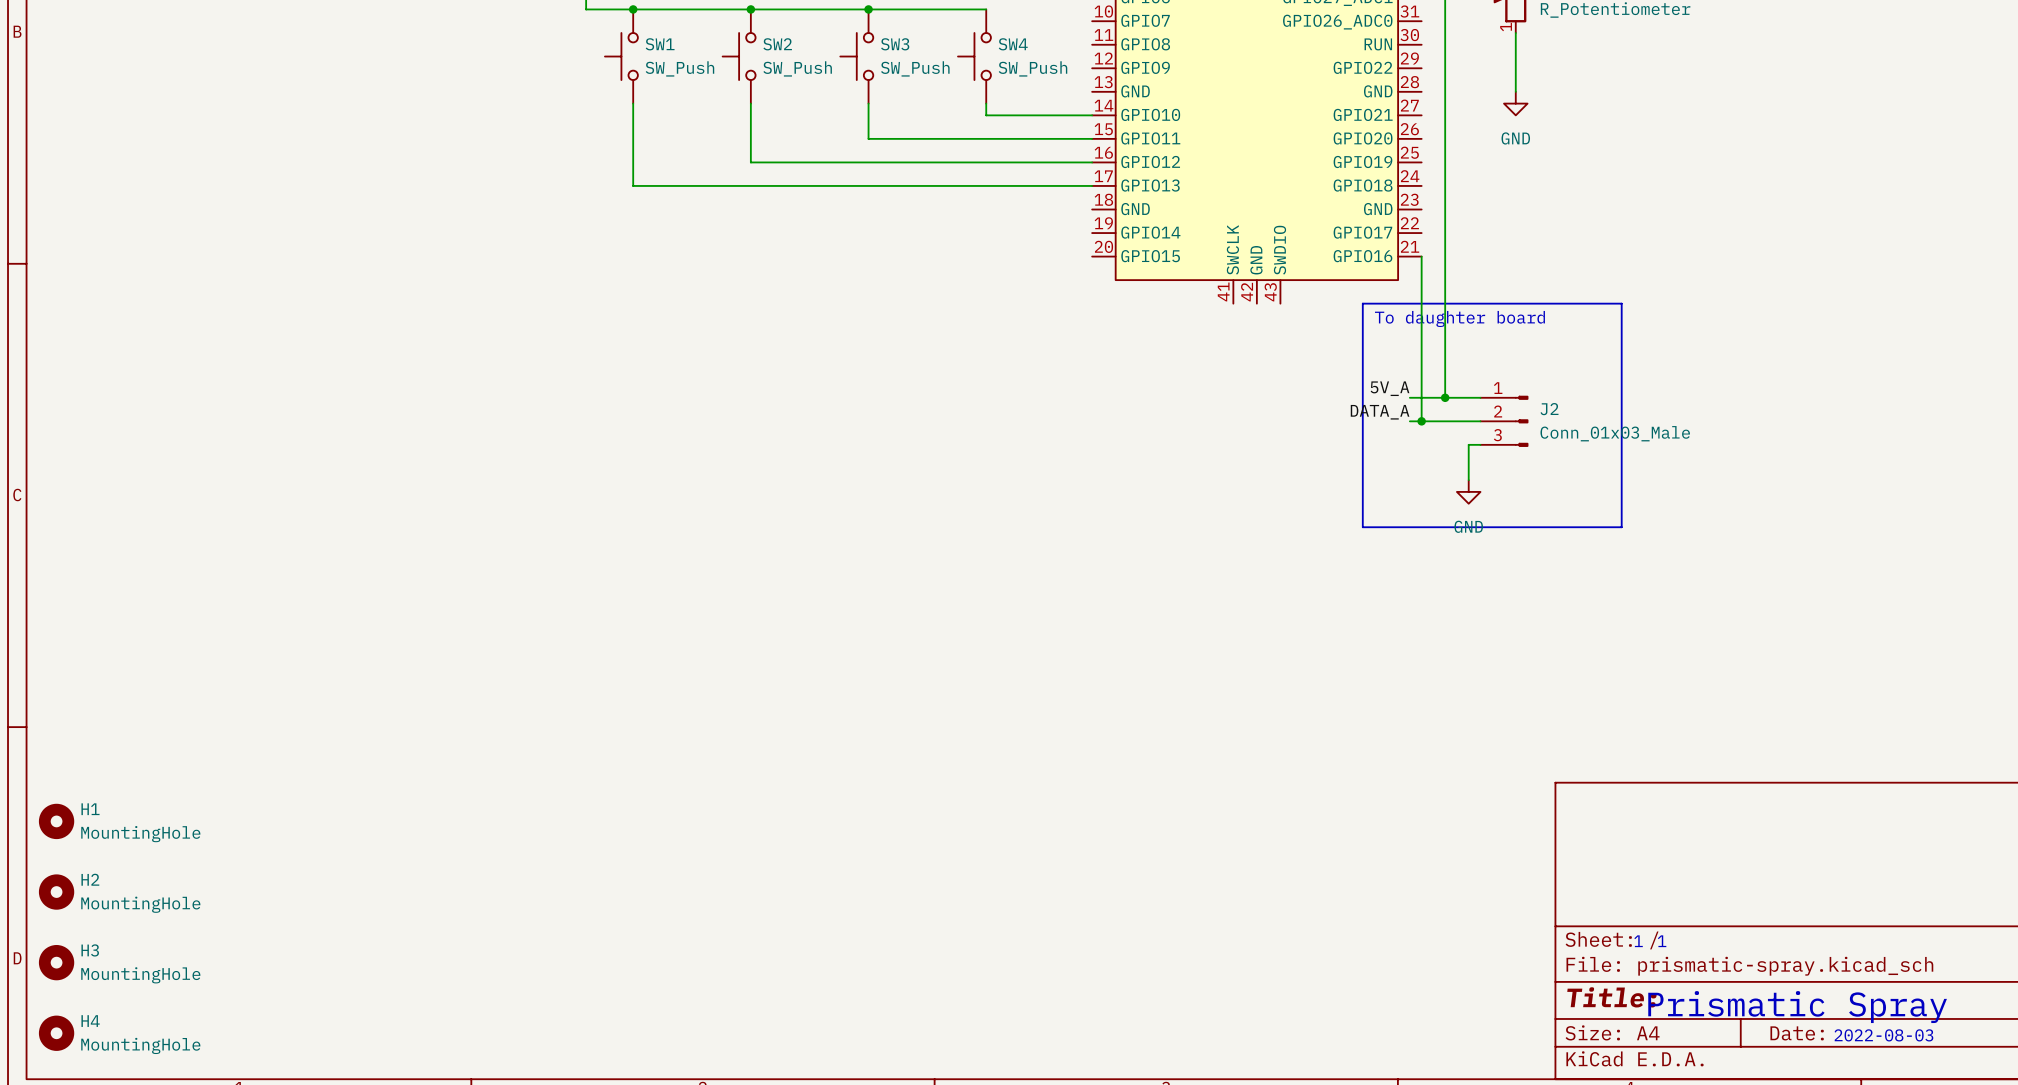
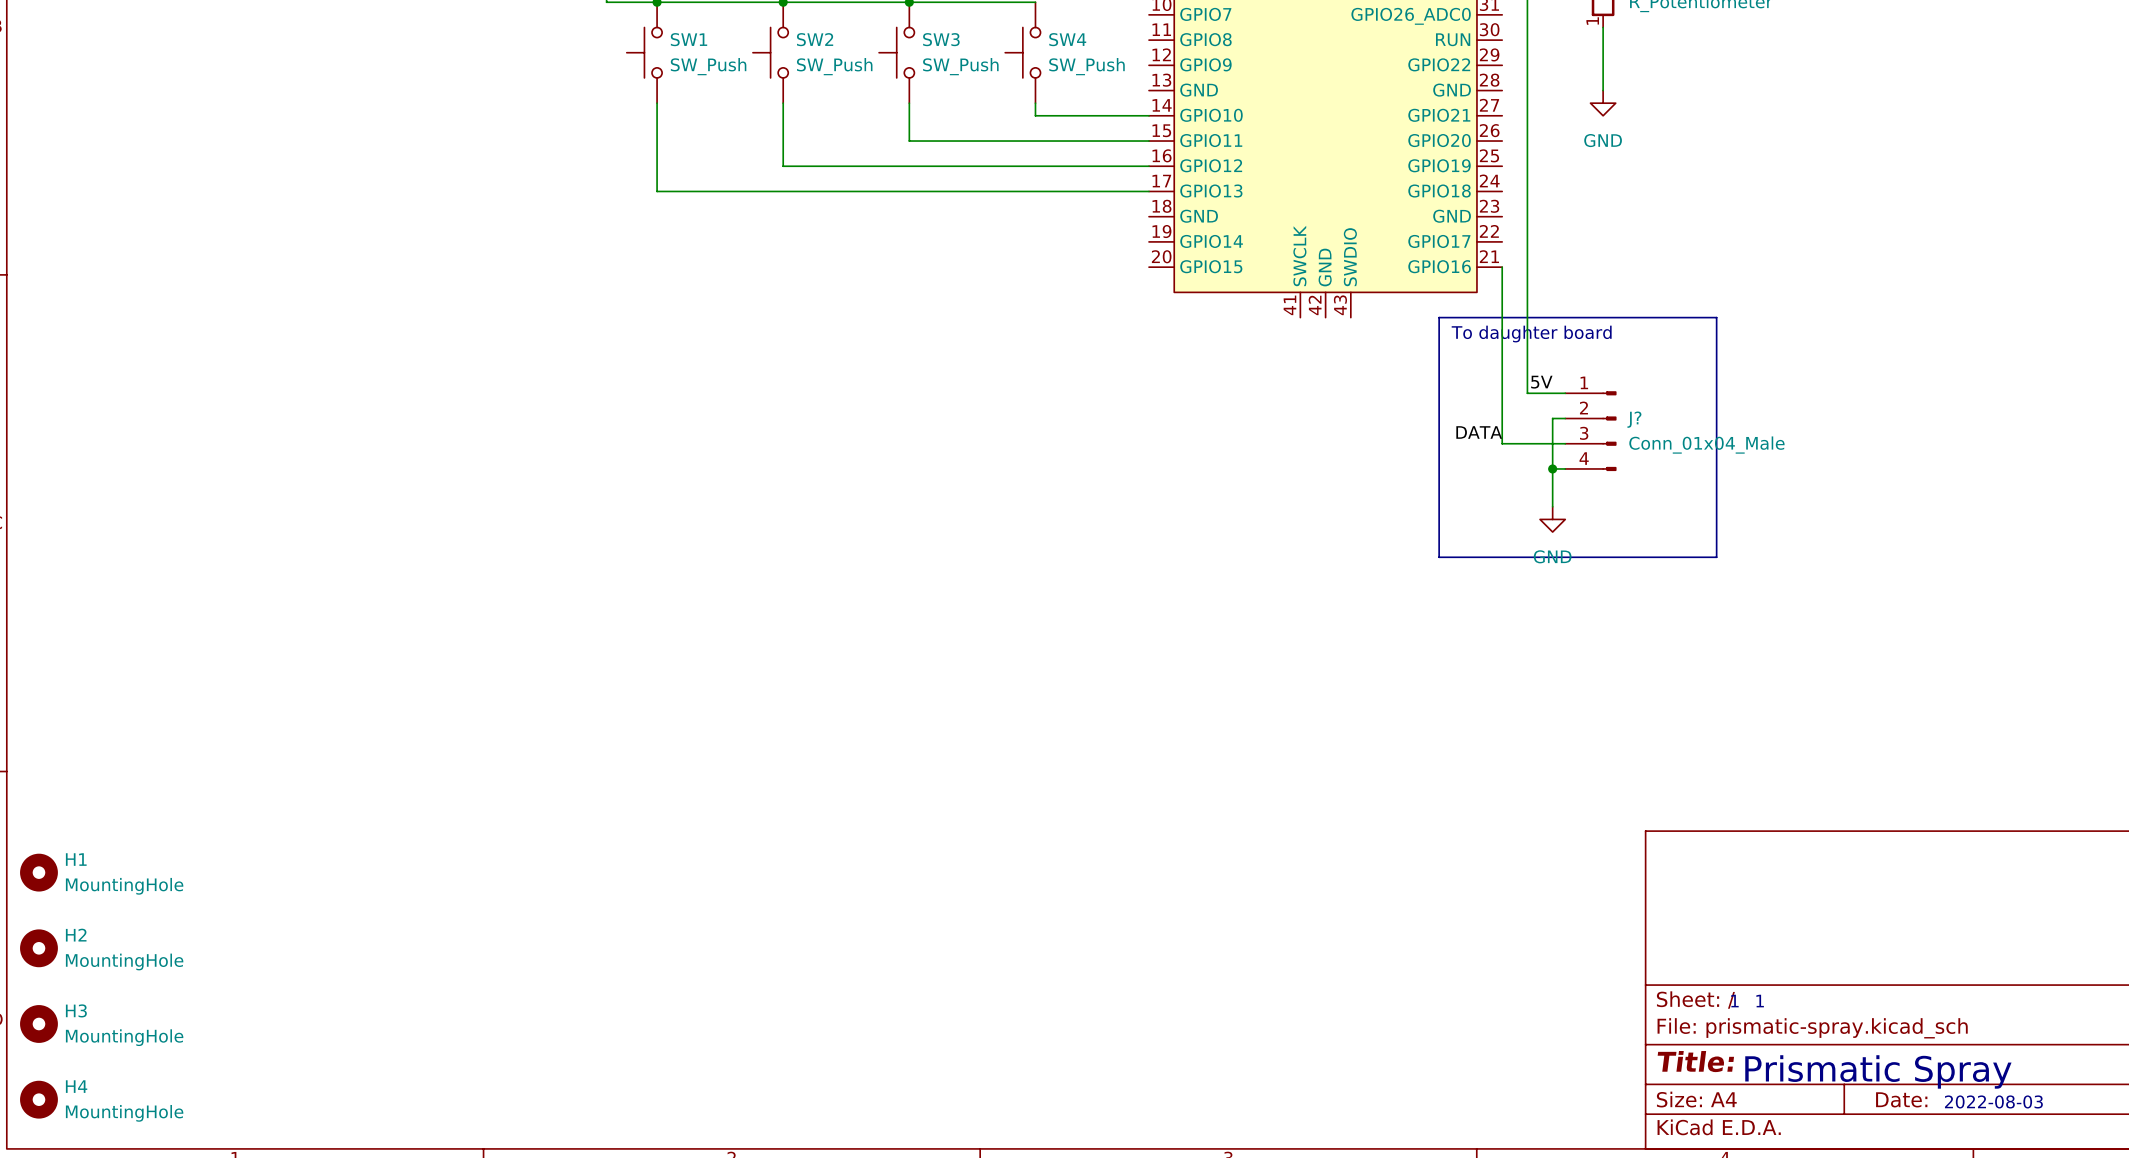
label: none -> 5V (1541, 382)
wire: (1445, 374) (1445, 397) -> (1527, 393) (1565, 393)
label: 5V_A (1390, 388) -> none
wire: (1409, 397) (1468, 397) -> (1552, 468) (1552, 418)
junction: (1445, 397) -> none
J?: none -> Conn_01x04_Male (1590, 431)
label: DATA_A (1380, 412) -> DATA (1479, 432)
wire: (1409, 421) (1421, 421) -> none
junction: (1421, 421) -> none
J2: Conn_01x03_Male (1504, 421) -> none
junction: none -> (1552, 468)

